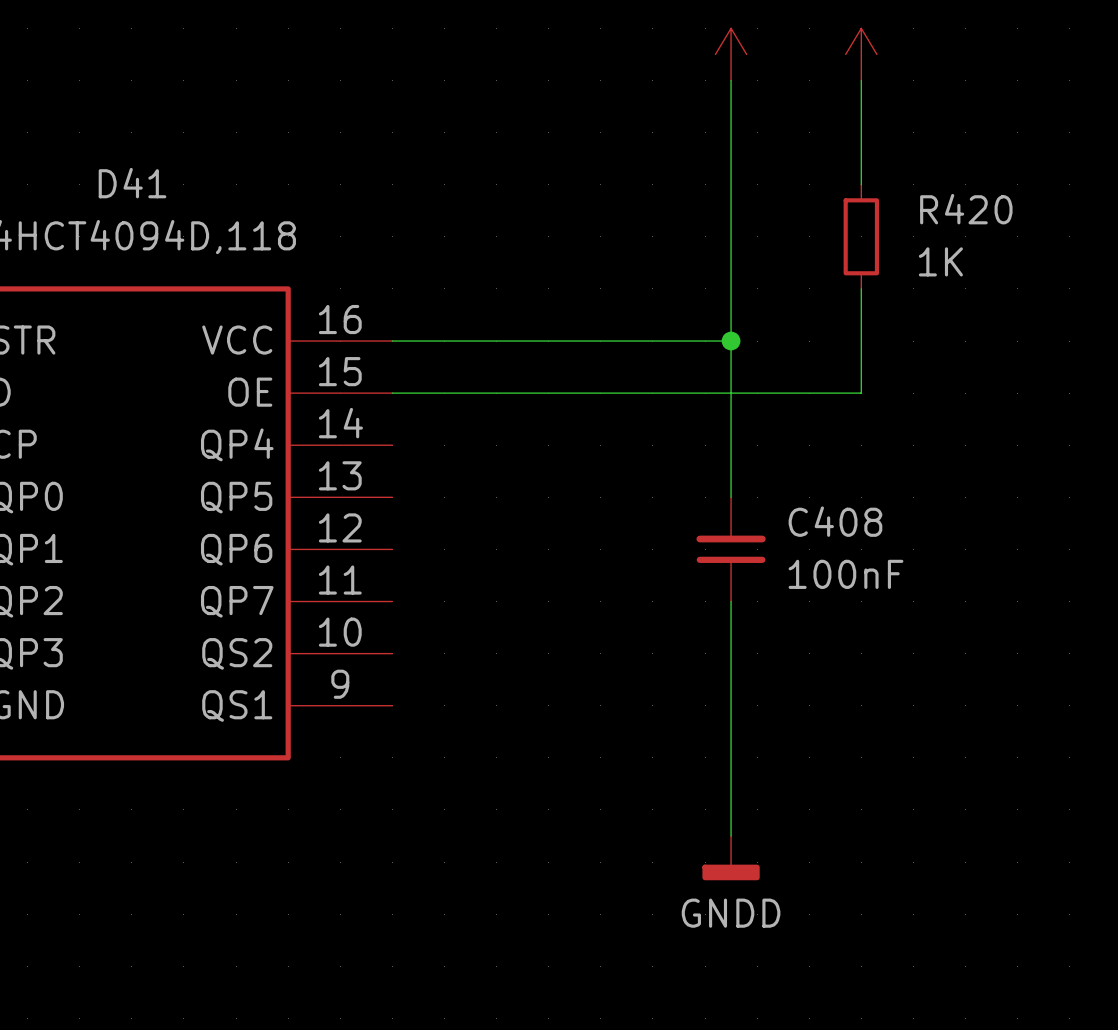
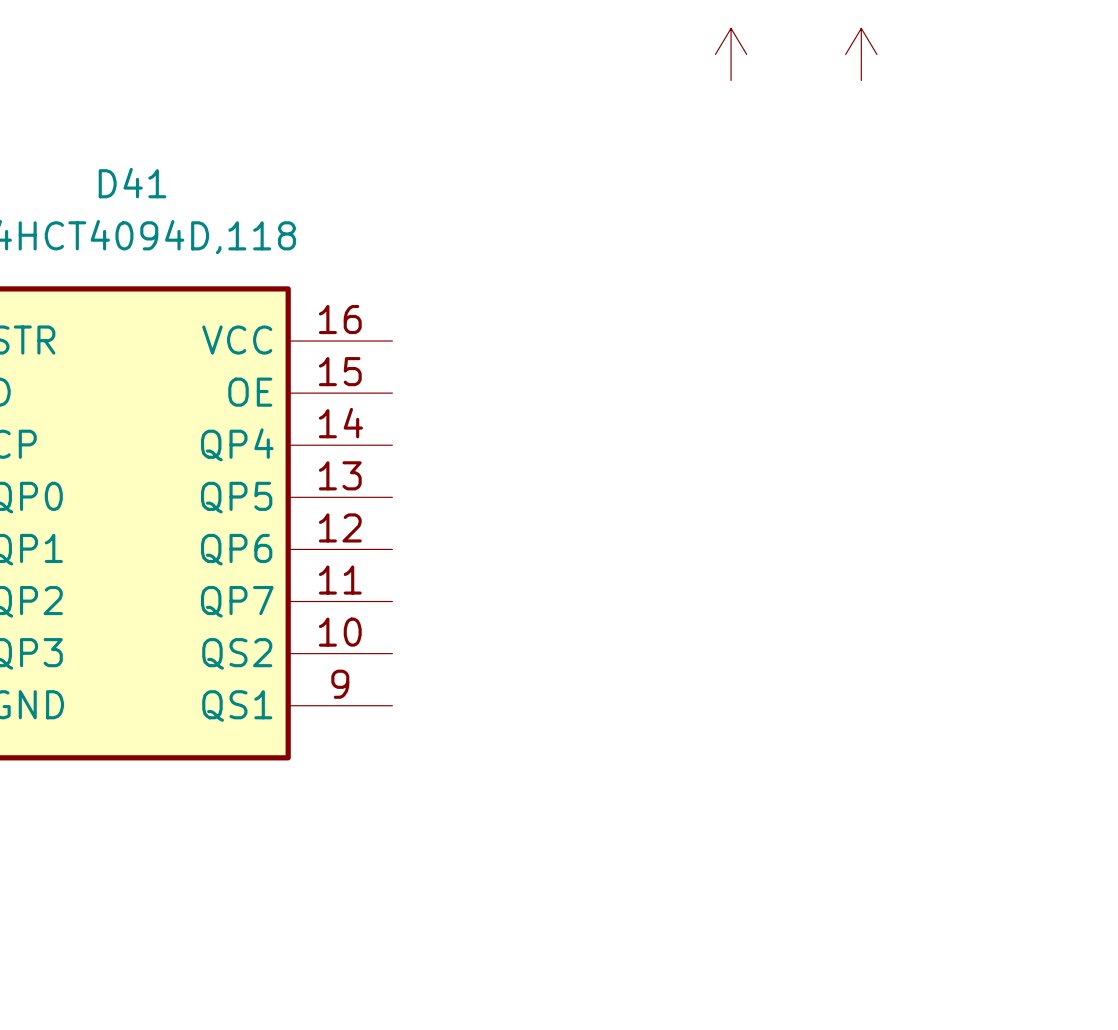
wire: (731, 80) (731, 497) -> none
wire: (861, 80) (861, 184) -> none
R420: 1K (861, 236) -> none
wire: (861, 288) (861, 393) (392, 393) -> none
wire: (392, 341) (731, 341) -> none
junction: (731, 341) -> none
C408: 100nF (731, 549) -> none
wire: (731, 601) (731, 835) -> none
power symbol: GNDD (731, 858) -> none

